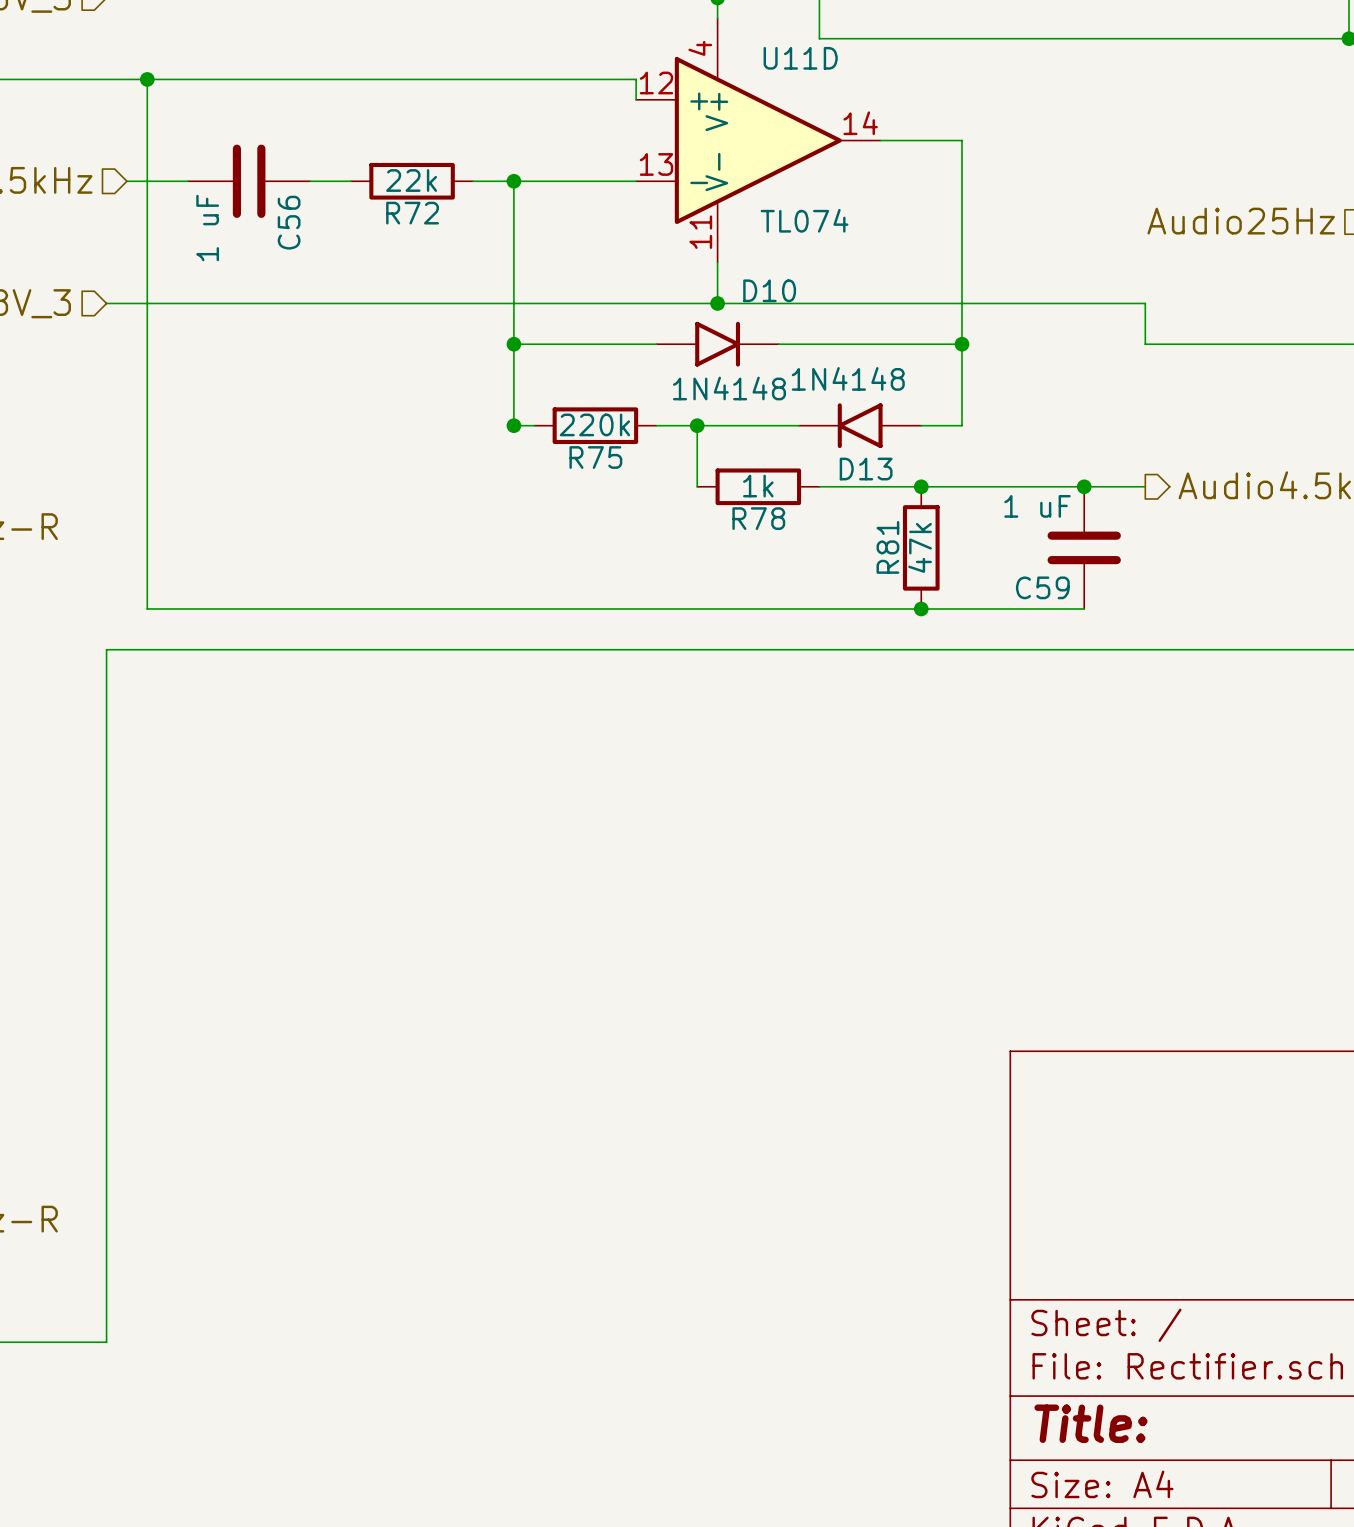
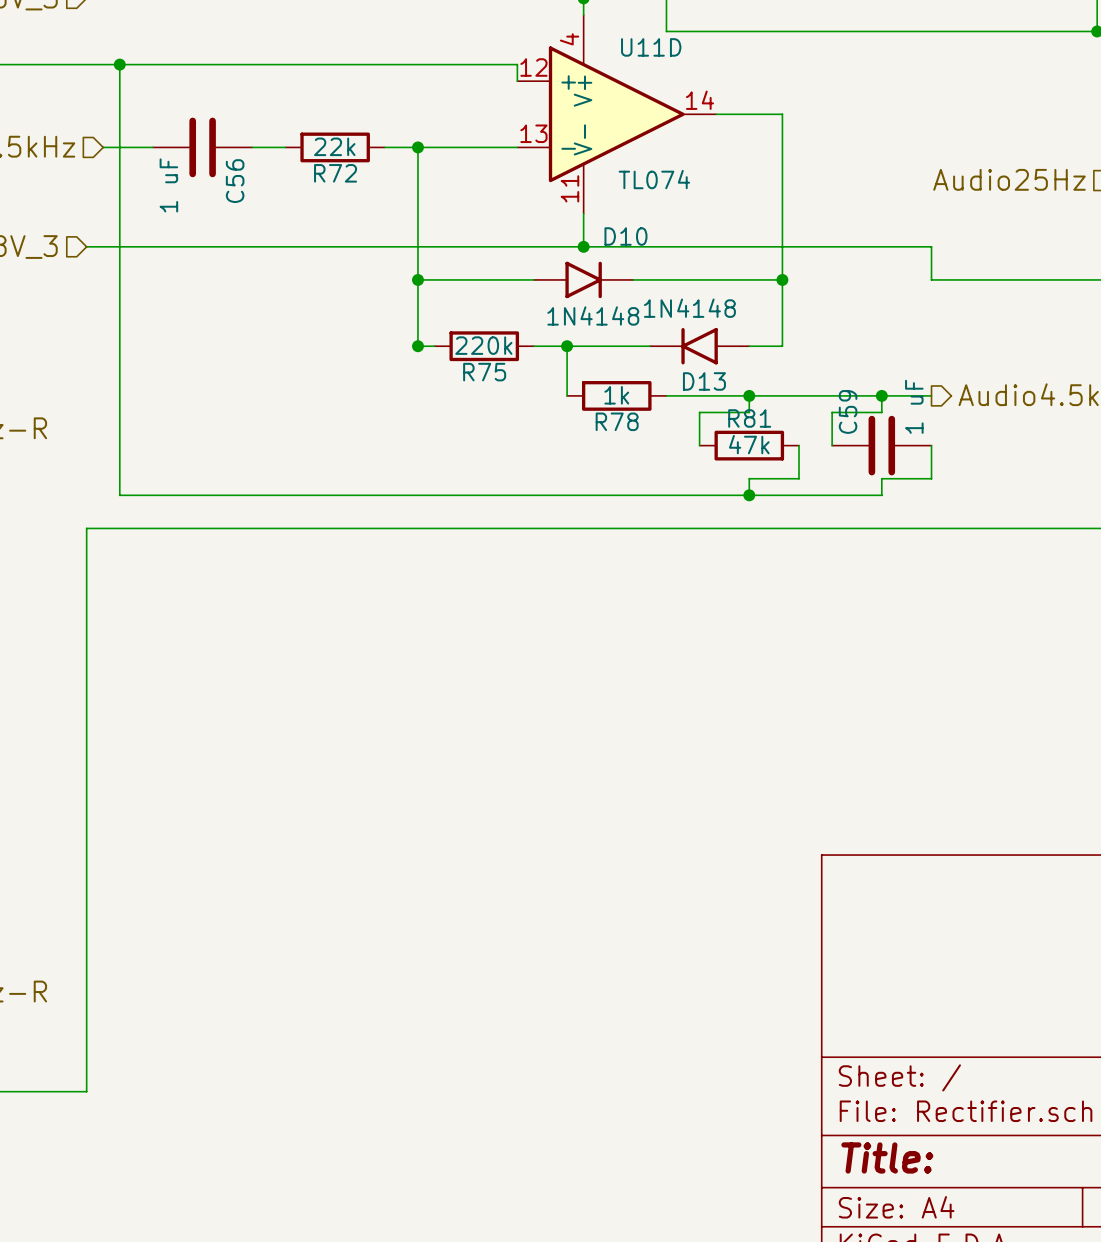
wire: none -> (749, 395) (749, 412) (699, 412) (699, 445)
wire: none -> (881, 395) (881, 412) (832, 412) (832, 445)
R81 rotation: 0° (921, 547) -> 90° clockwise (749, 445)
wire: none -> (798, 445) (798, 478) (749, 478) (749, 495)
C59 rotation: 0° (1084, 547) -> 90° clockwise (881, 445)
wire: none -> (931, 445) (931, 478) (881, 478) (881, 495)

